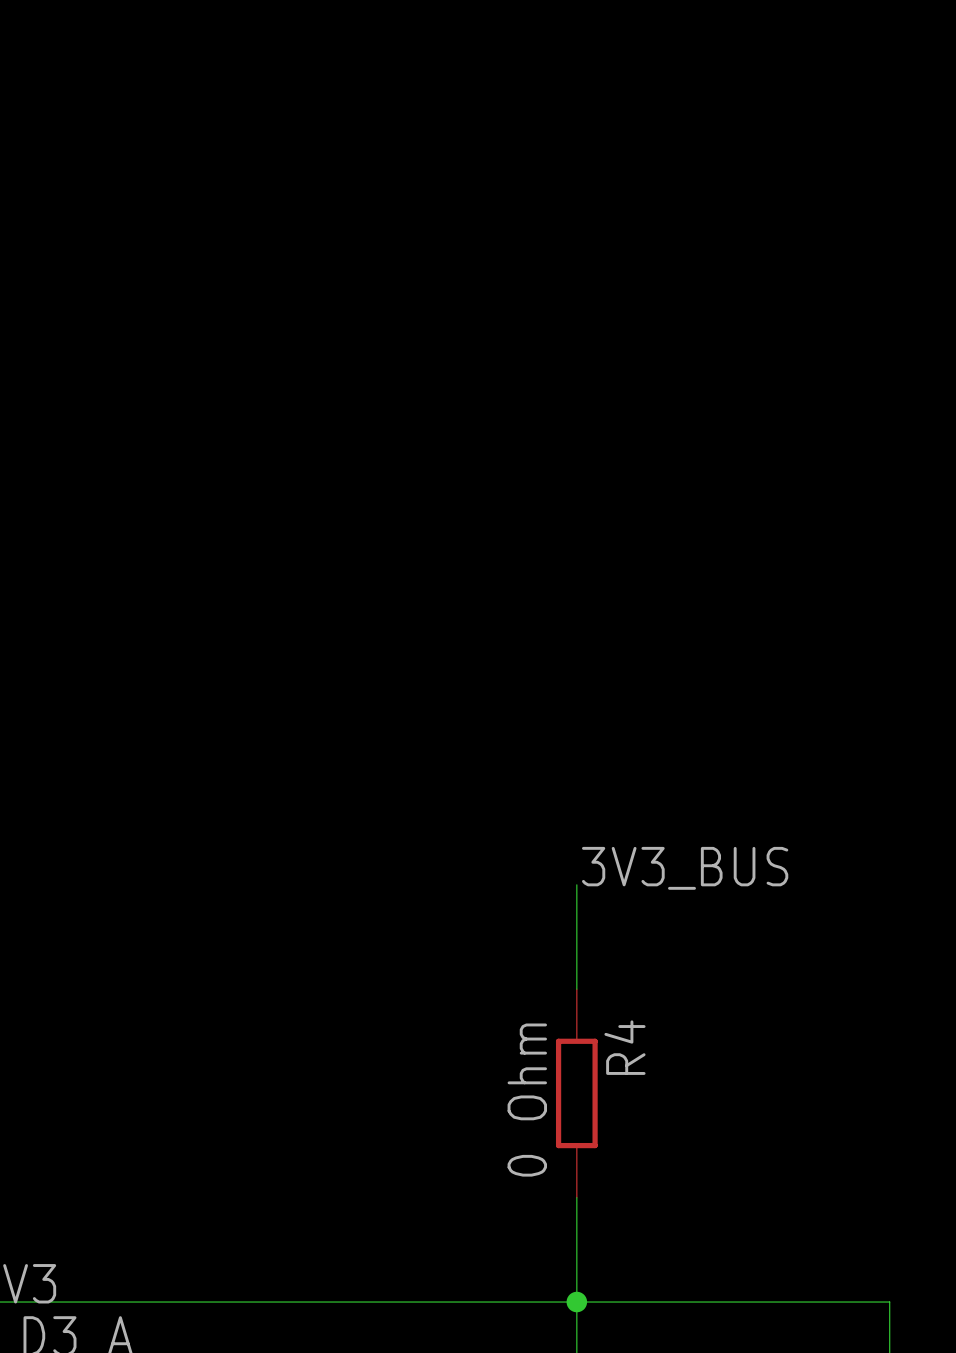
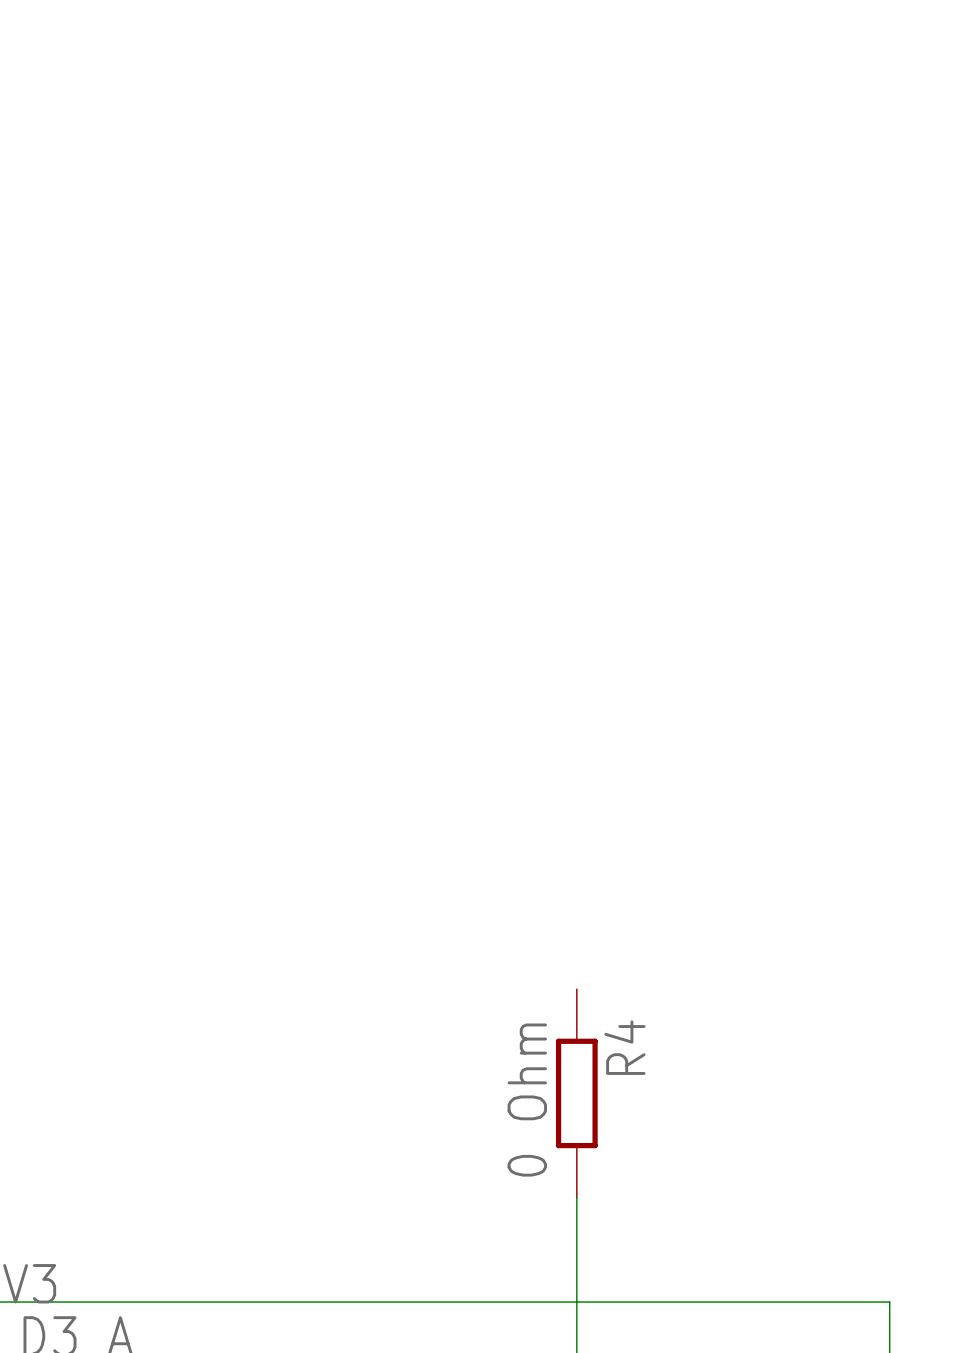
label: 3V3_BUS (685, 868) -> none
wire: (576, 884) (576, 989) -> none
junction: (576, 1302) -> none

